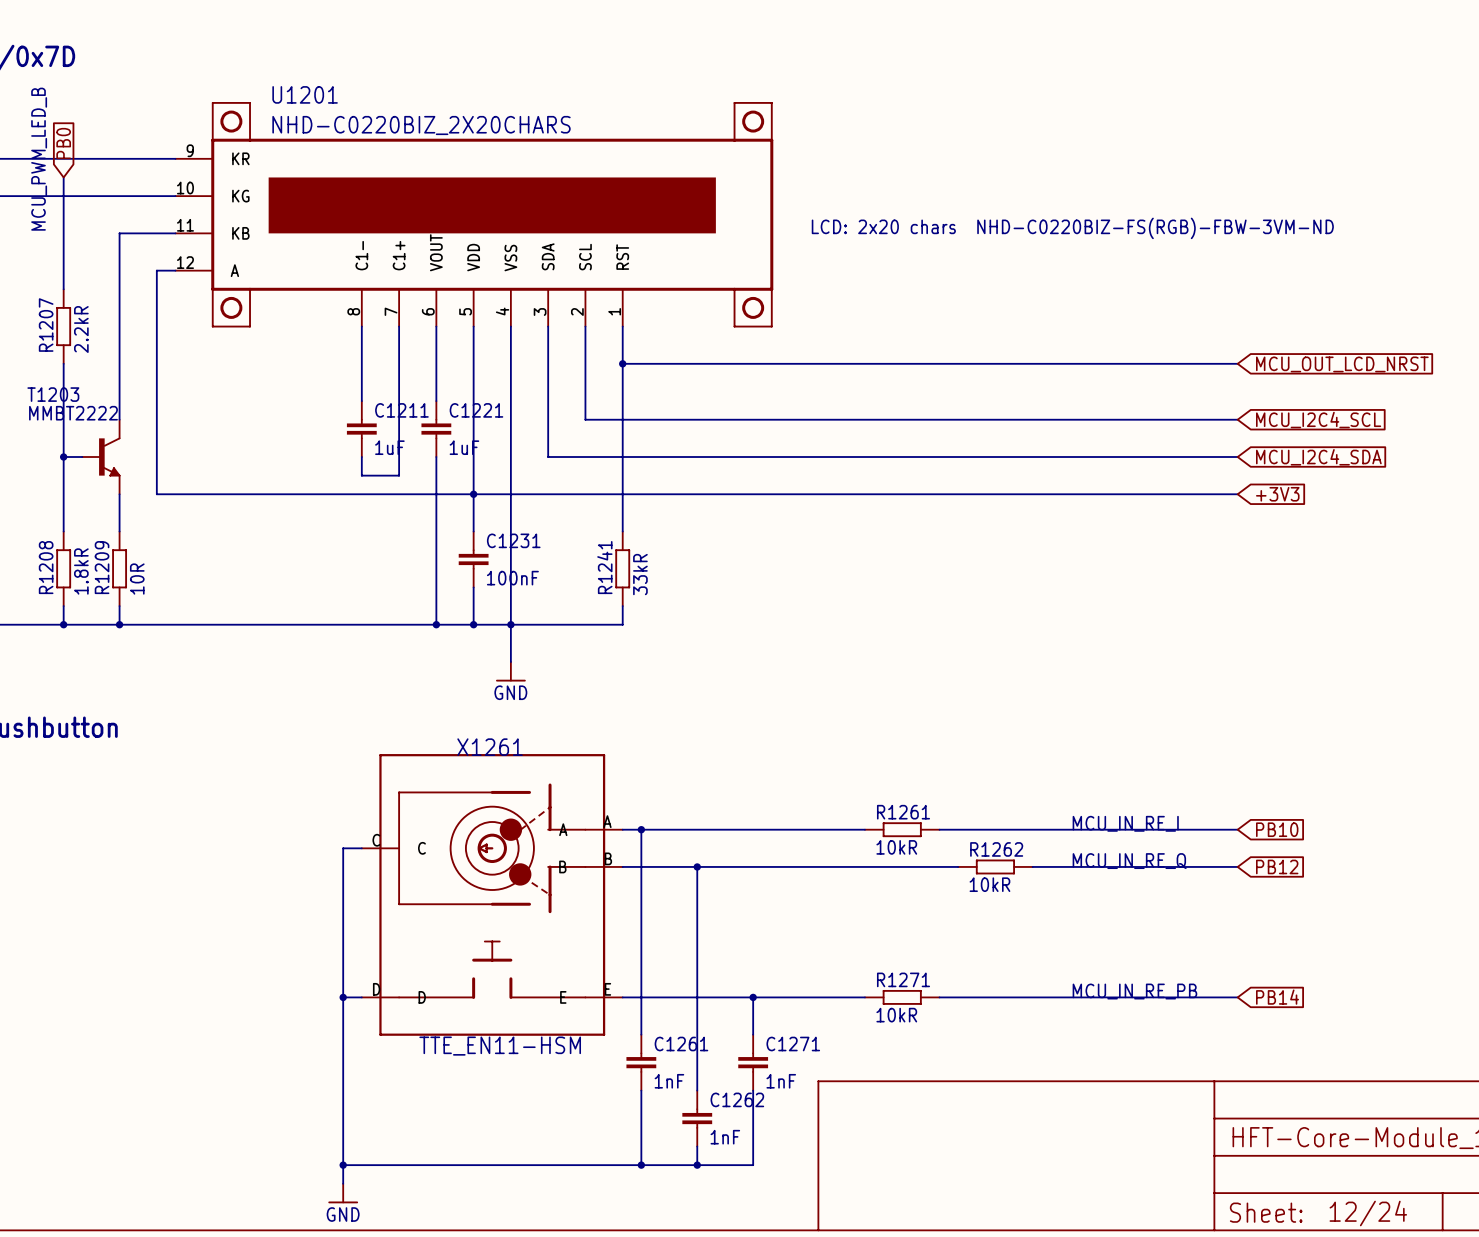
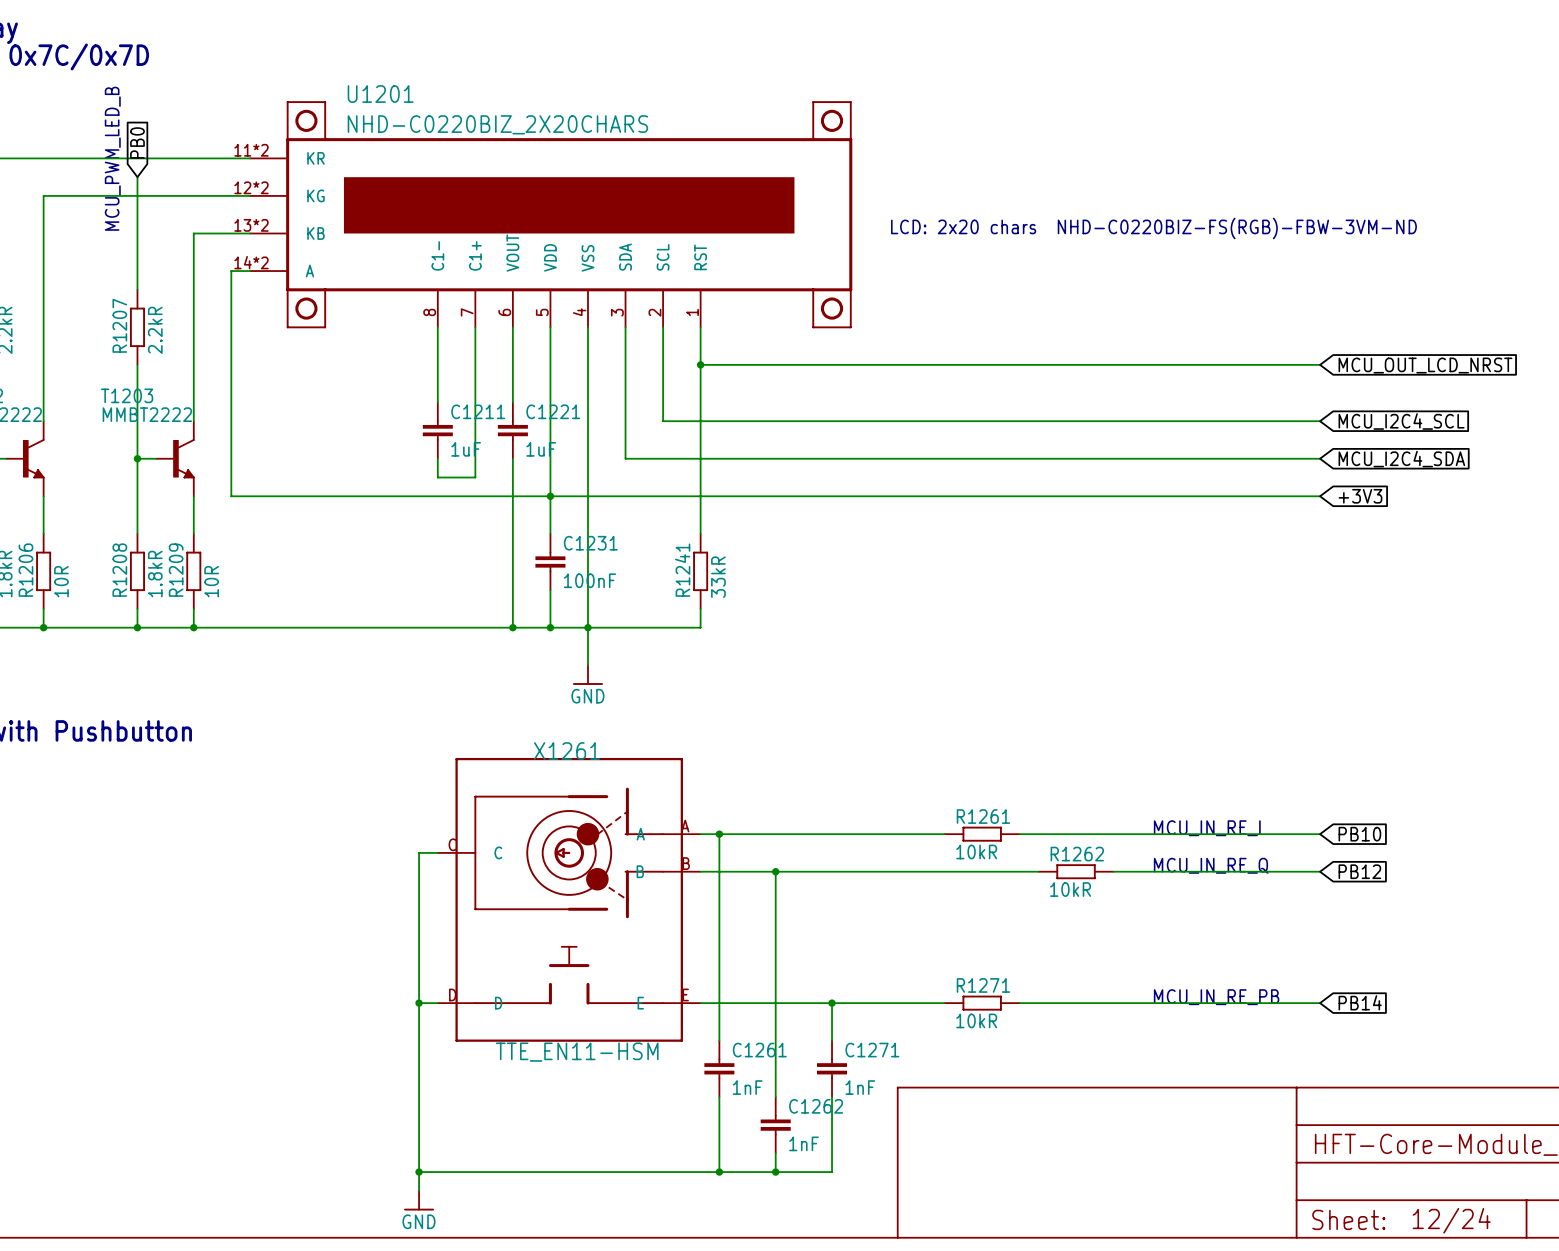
U1201 pin number: 9 (190, 150) -> 11*2 (251, 150)
U1201 pin number: 10 (185, 188) -> 12*2 (251, 187)
U1201 pin number: 11 (185, 225) -> 13*2 (251, 225)
U1201 pin number: 12 (185, 262) -> 14*2 (251, 262)

